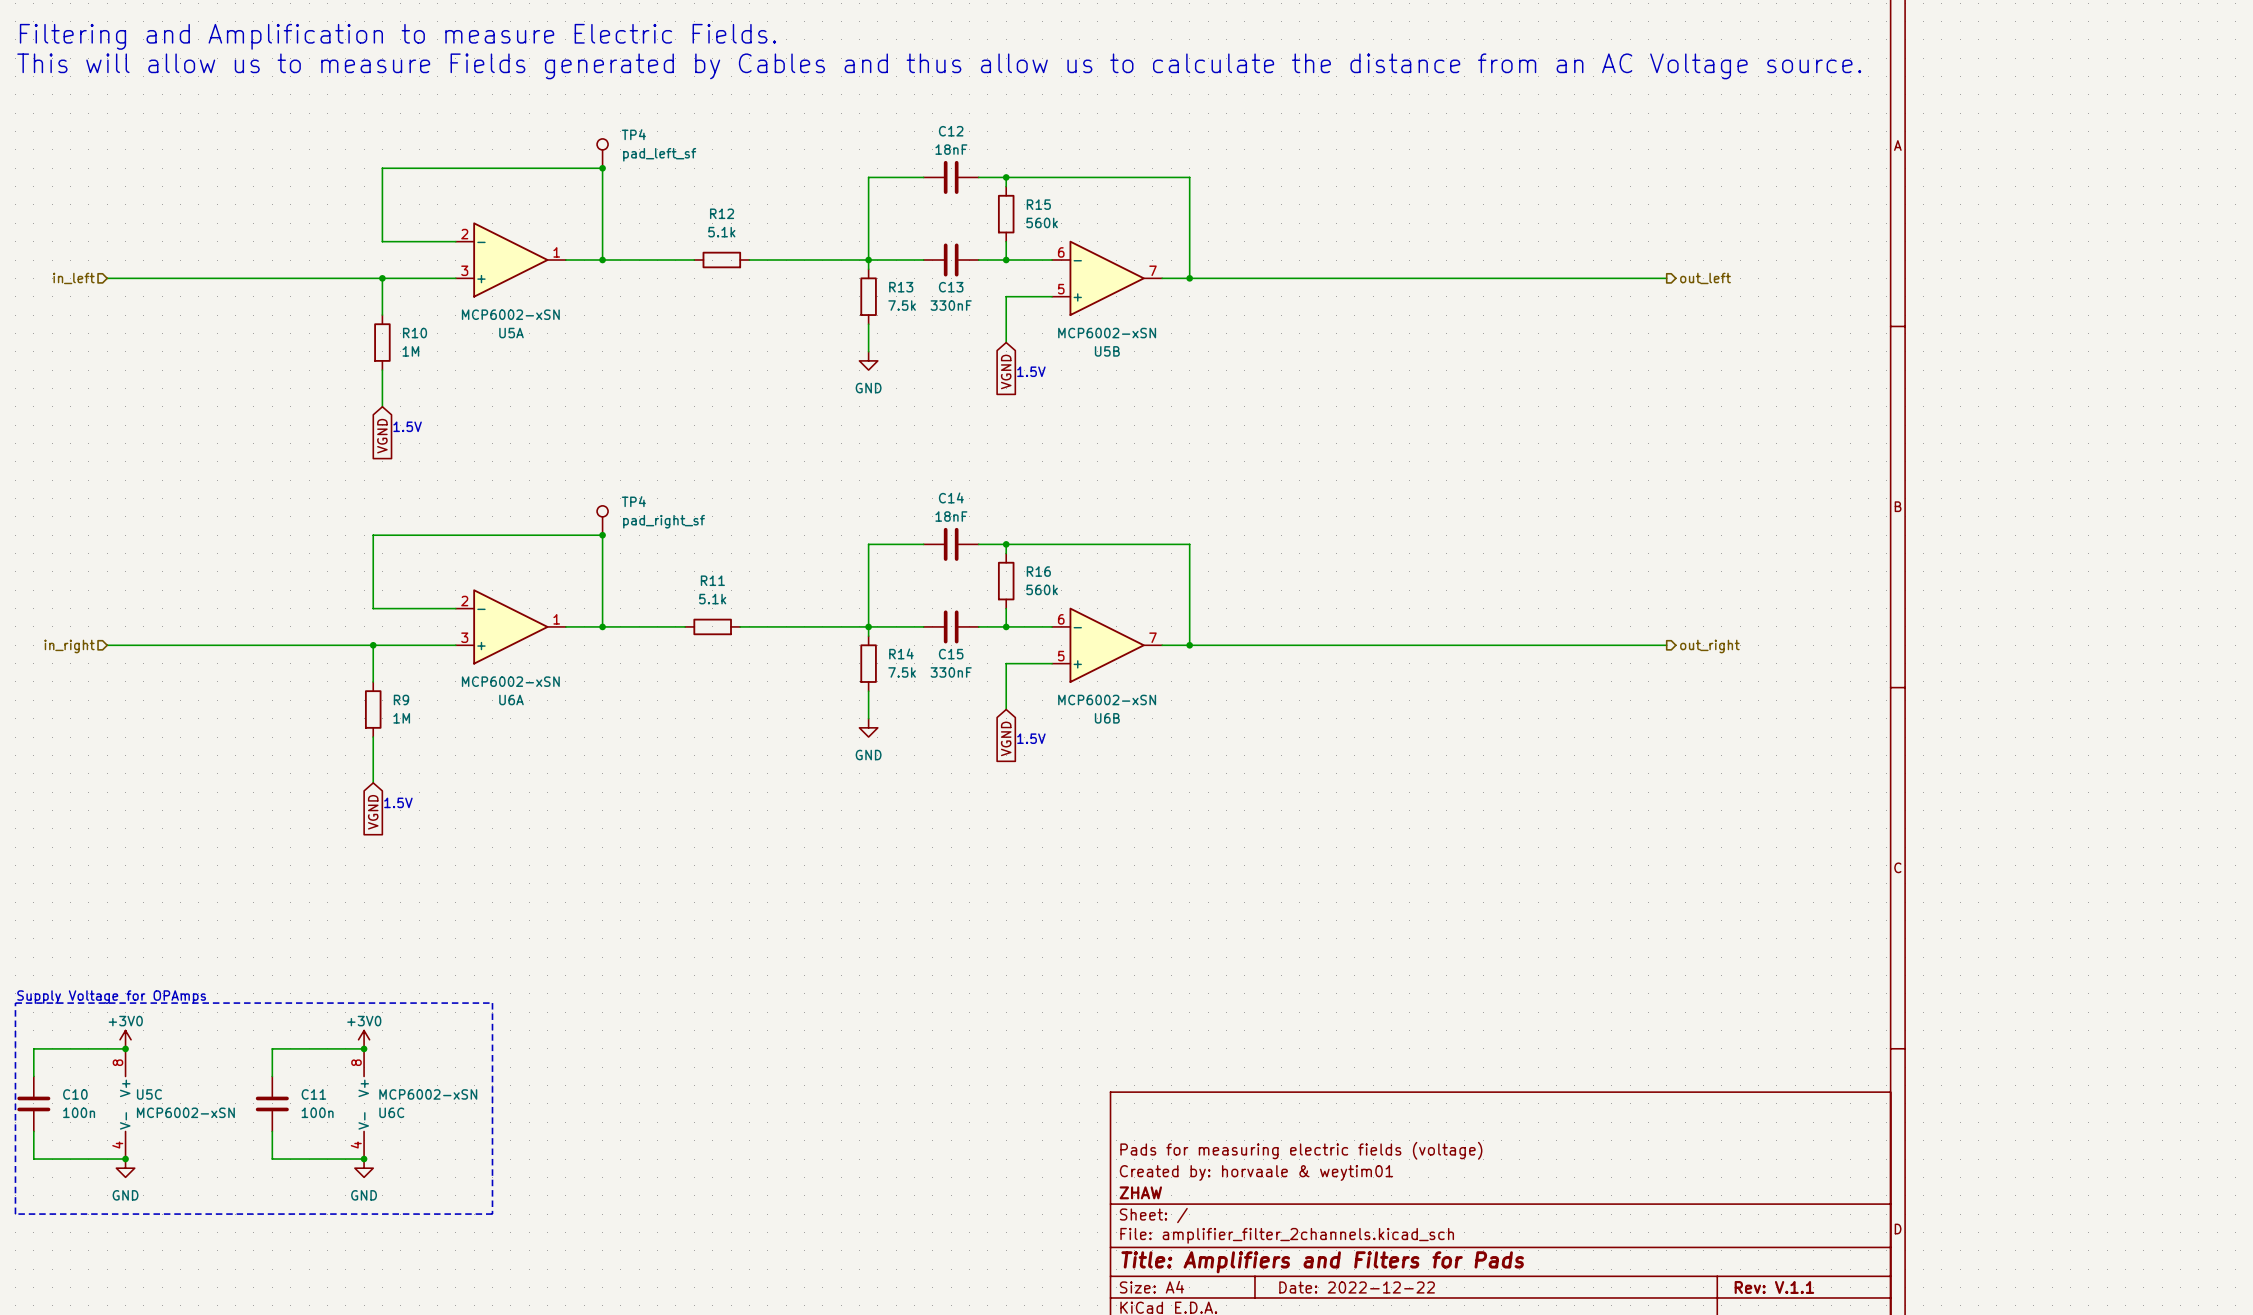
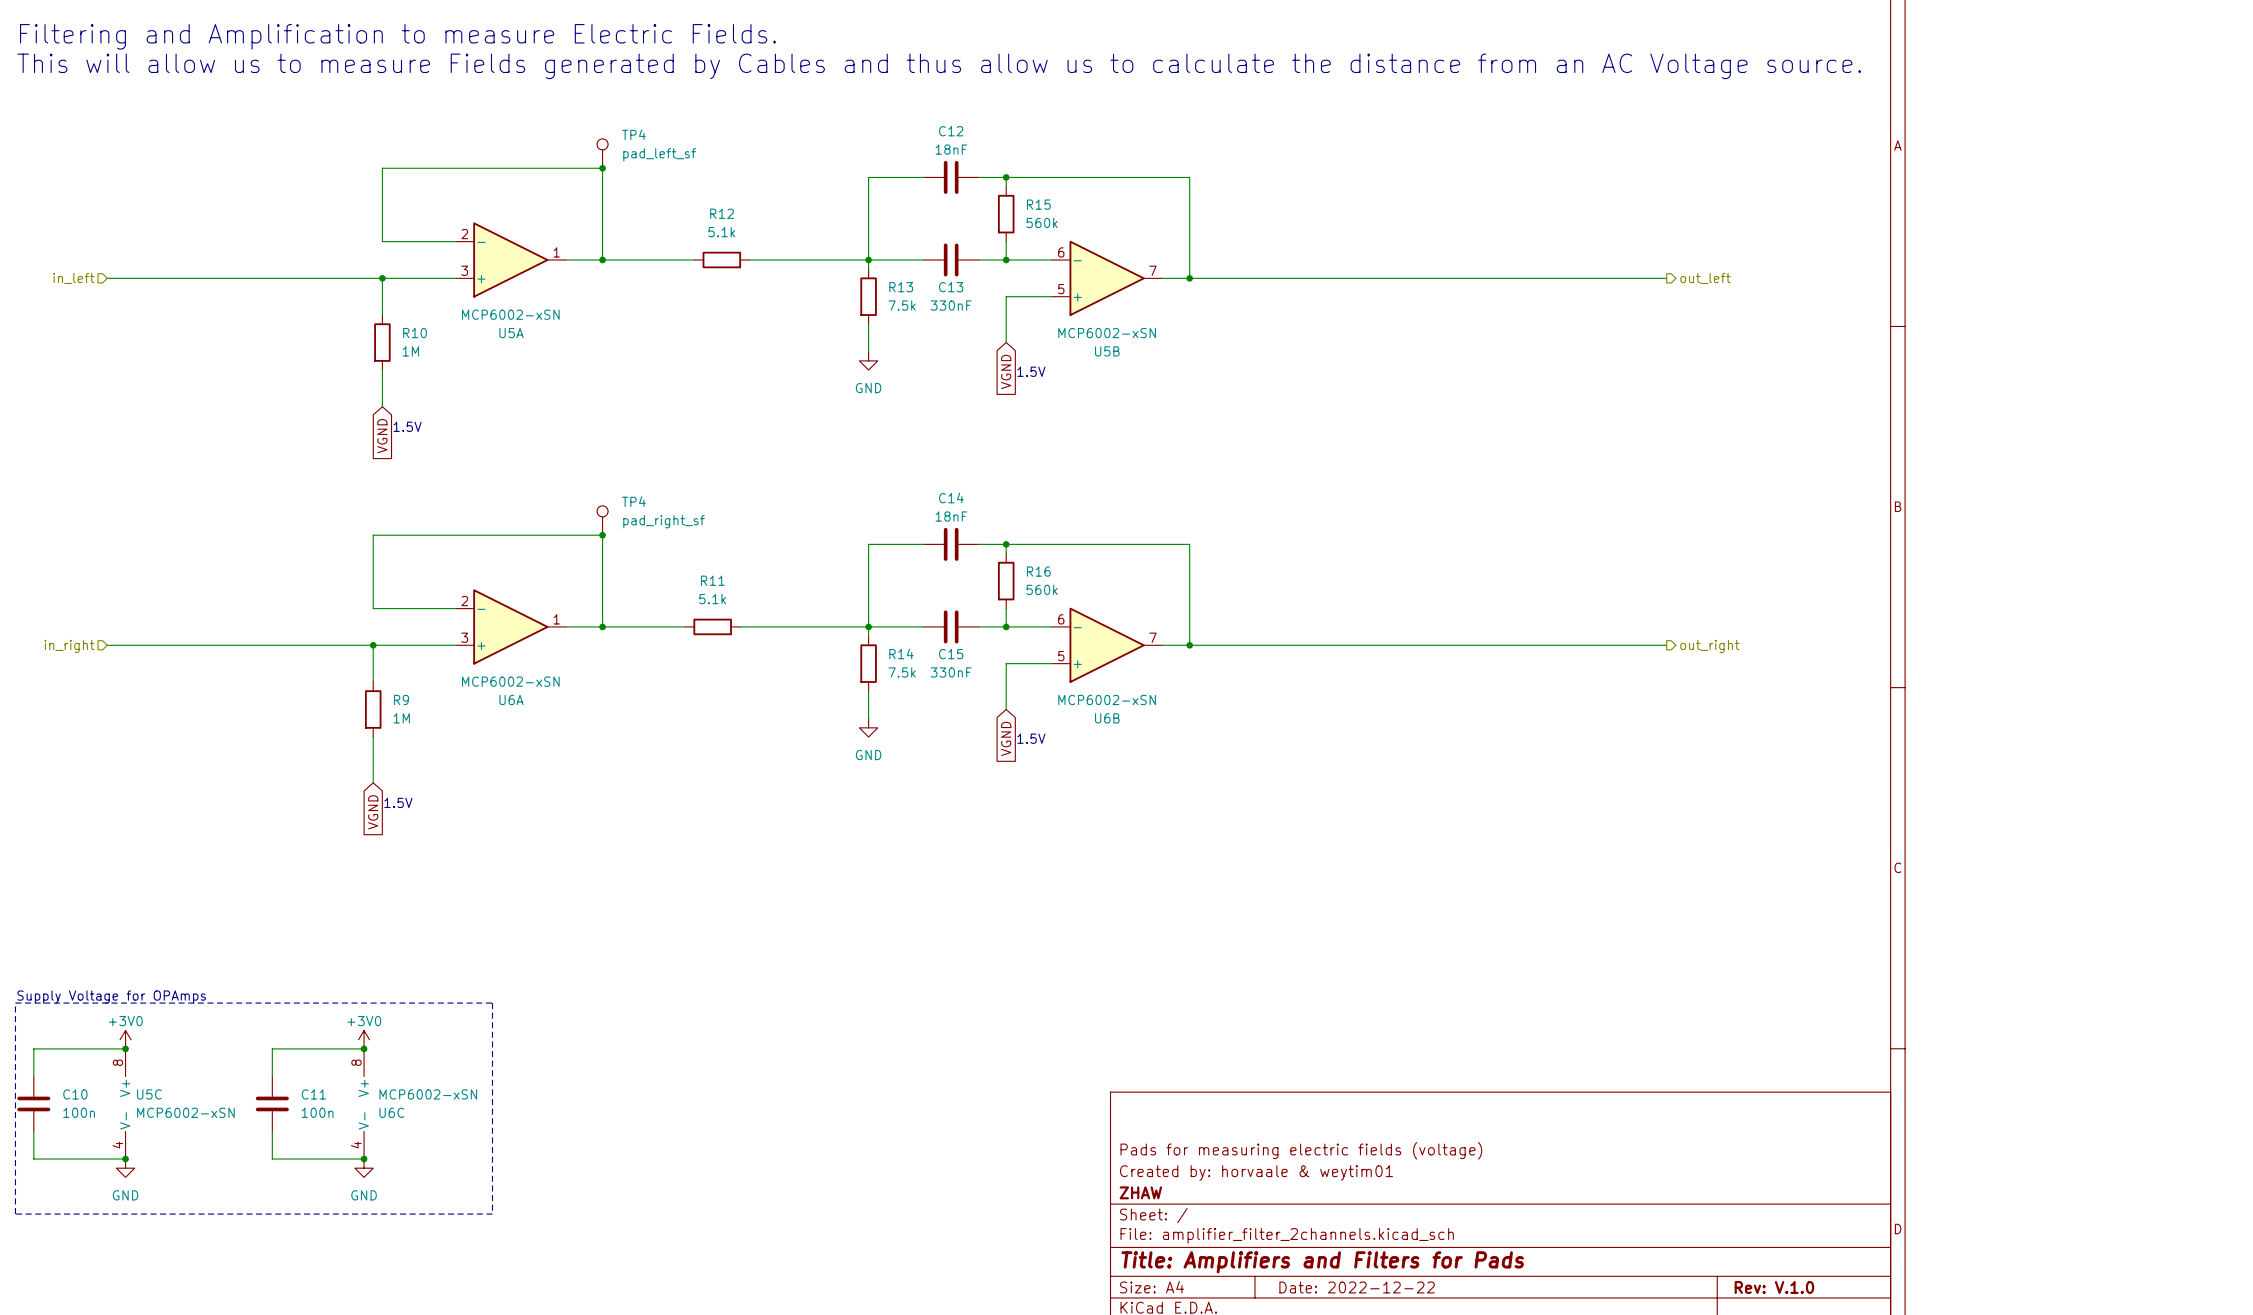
title block: Rev: V.1.1 (1774, 1287) -> Rev: V.1.0 (1774, 1287)

